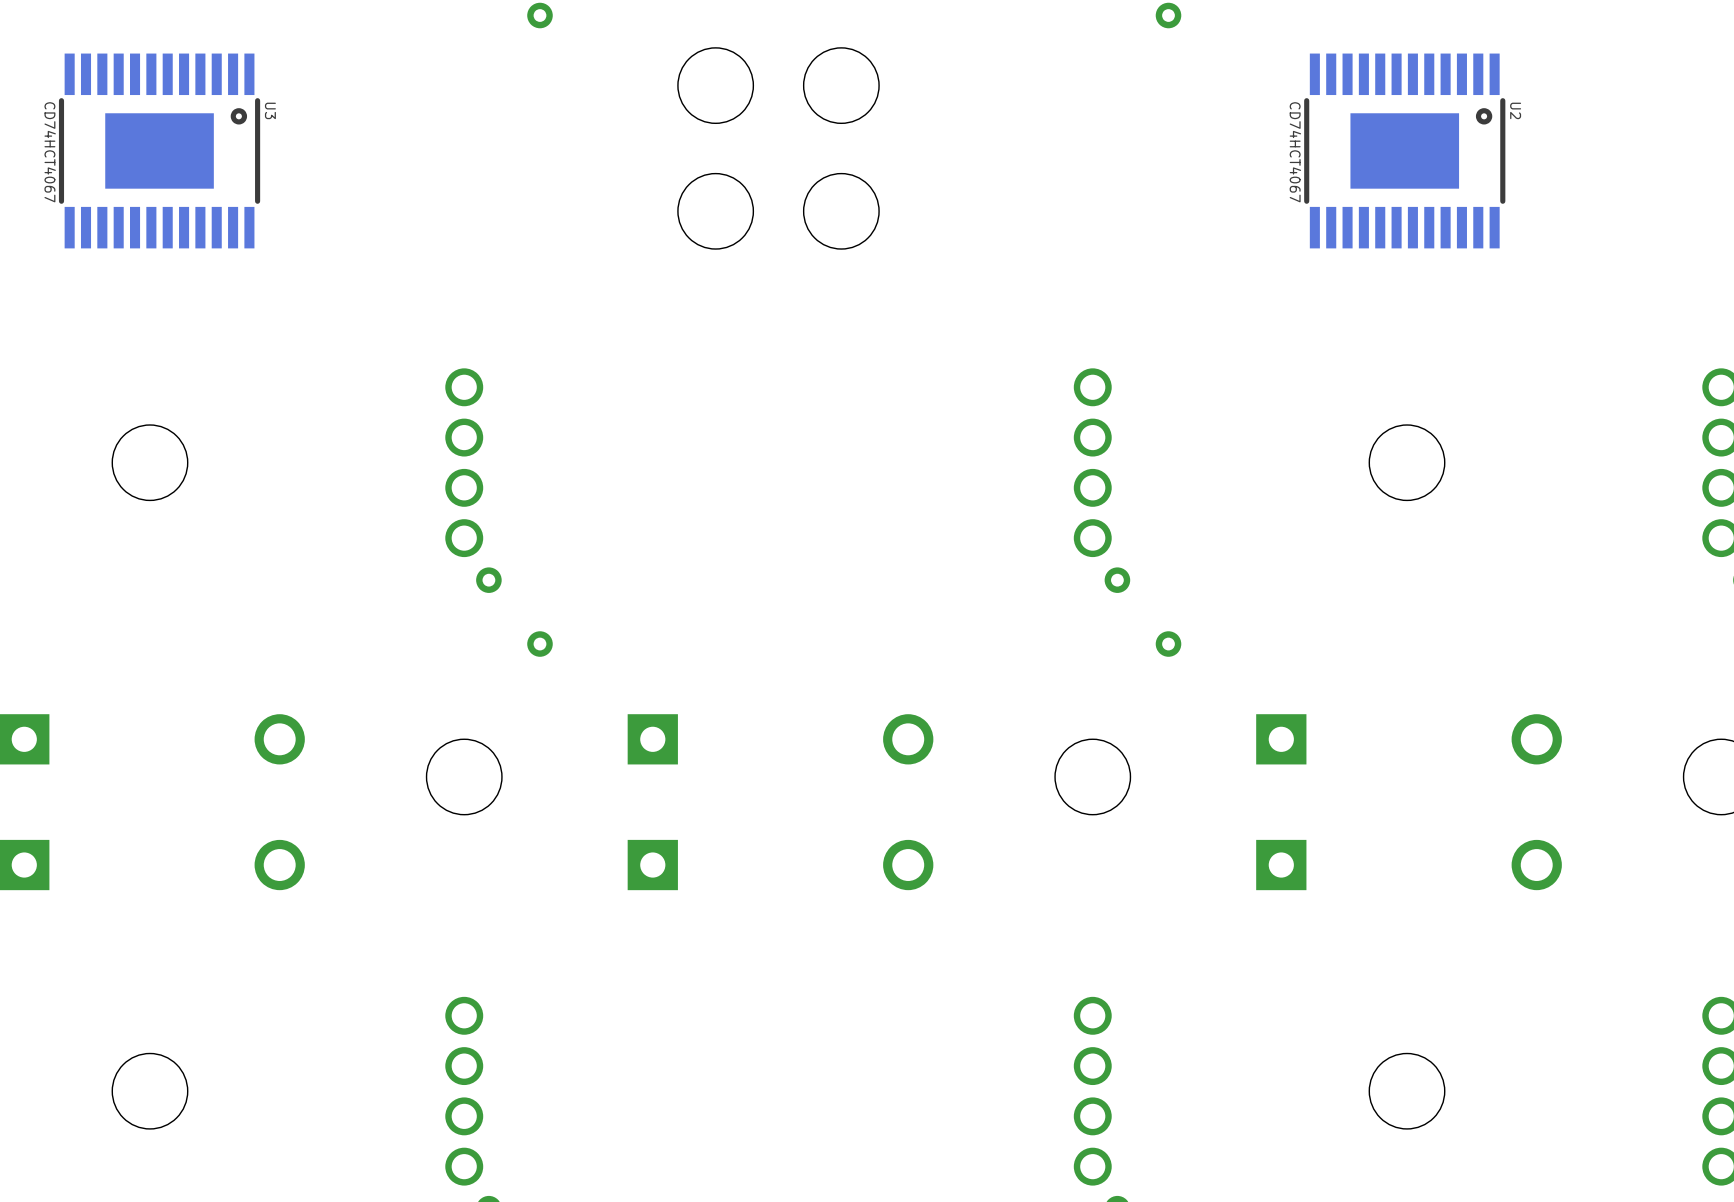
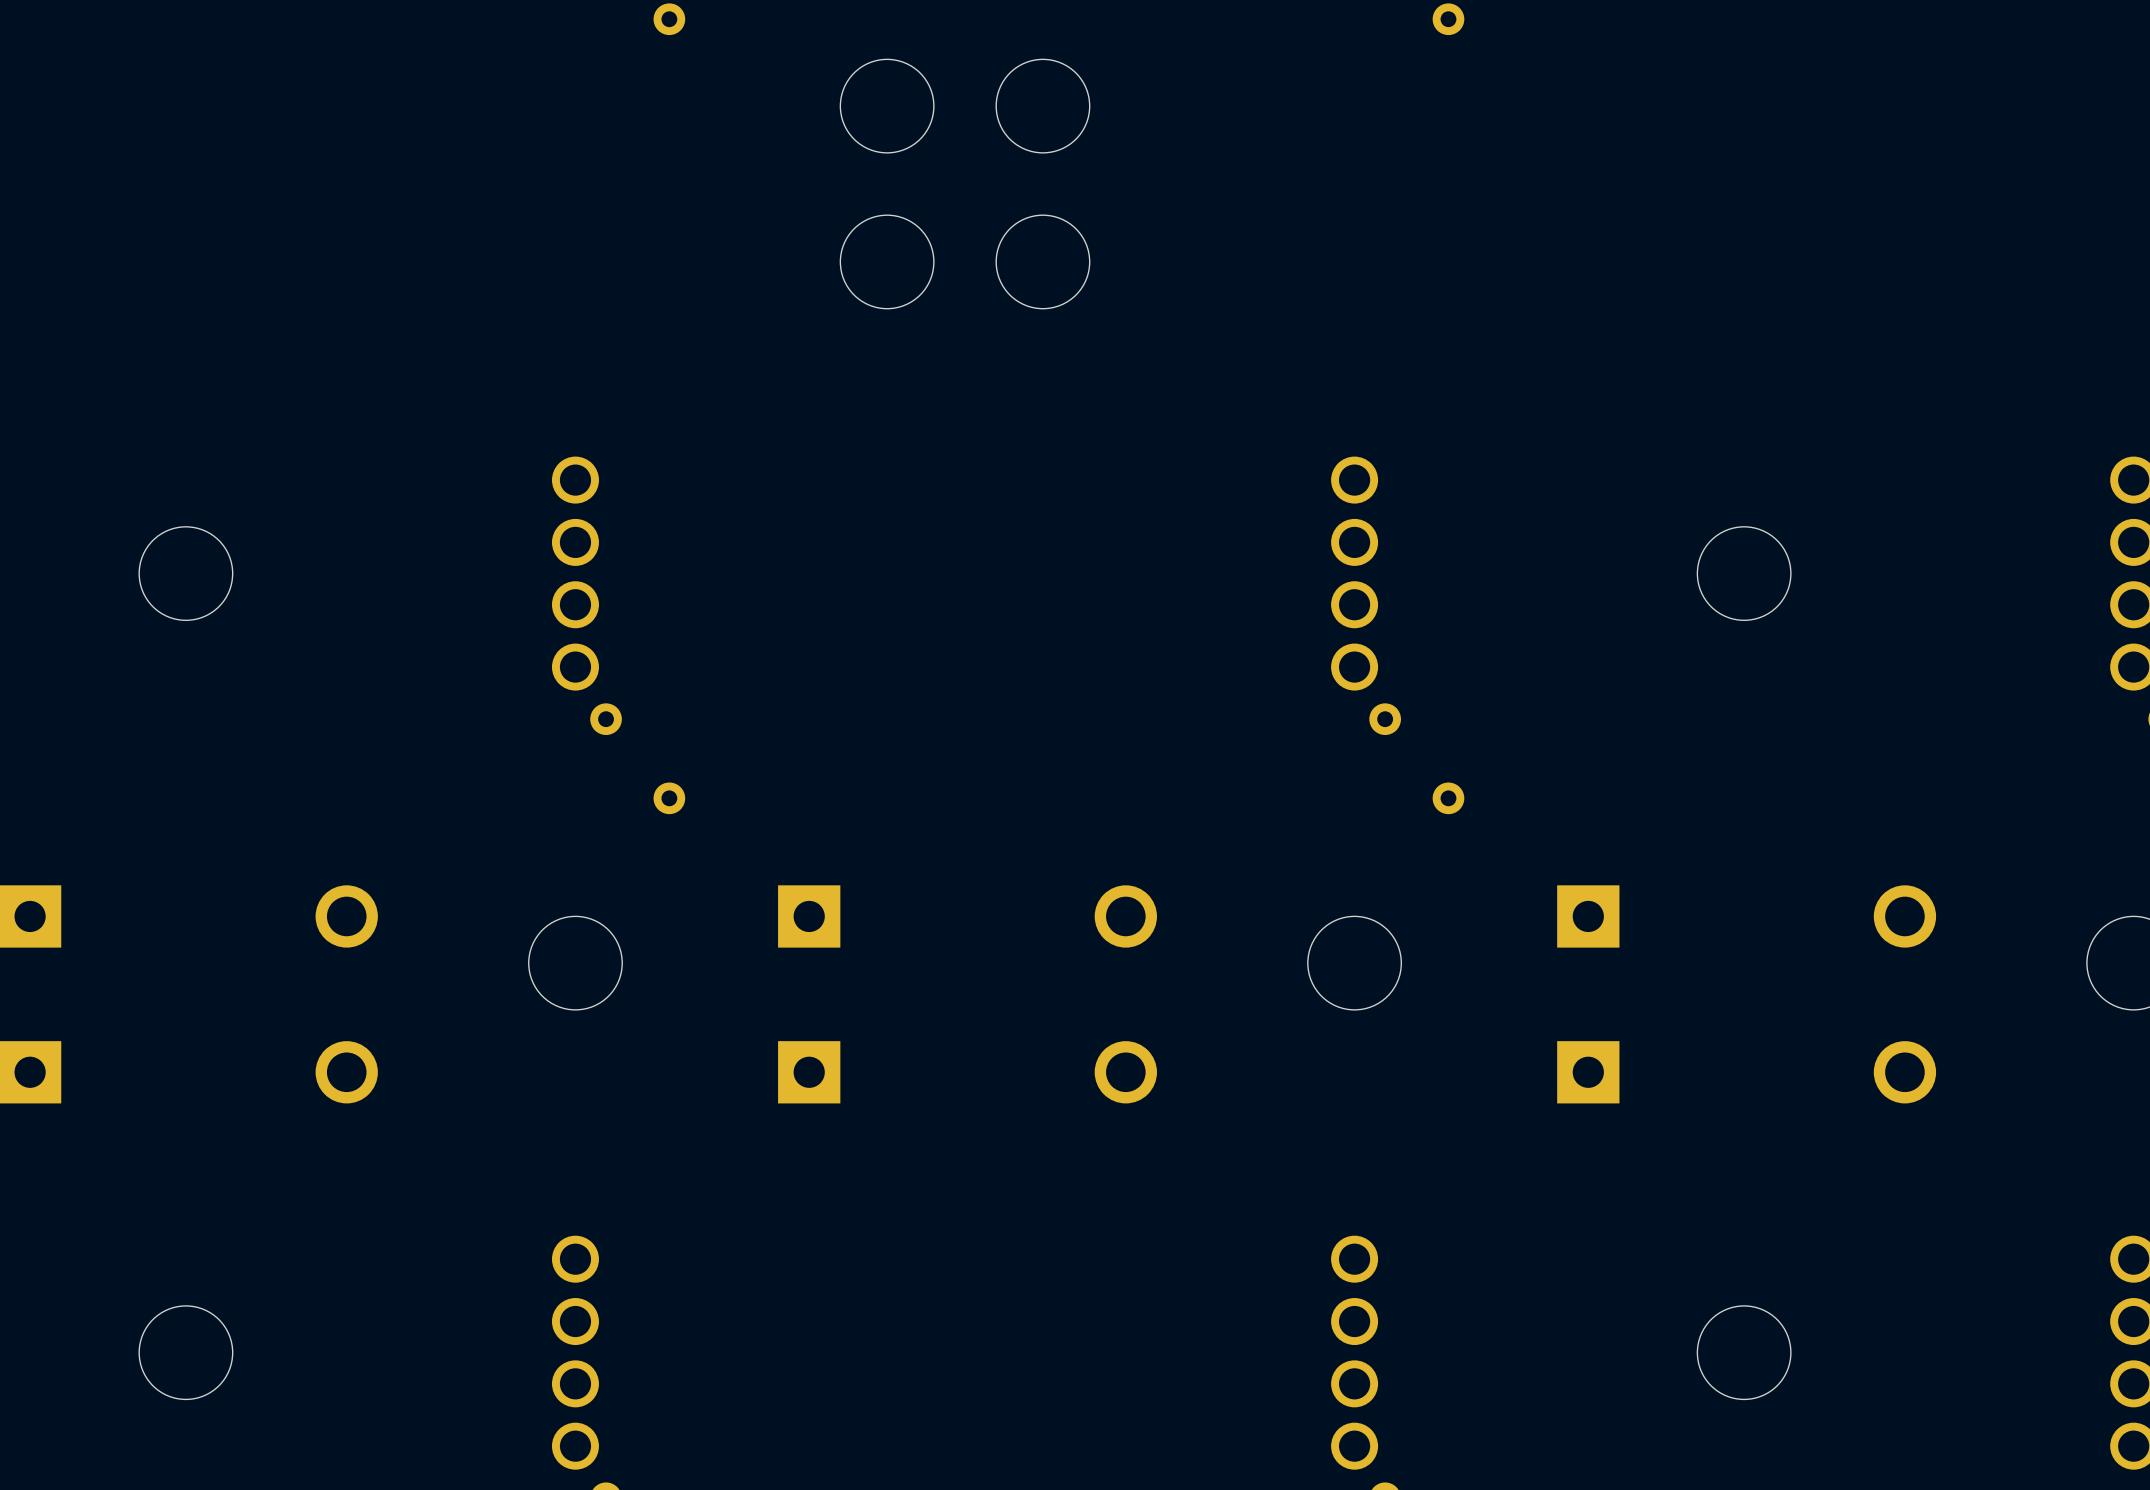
U3: CD74HCT4067 (159, 150) -> none
U2: CD74HCT4067 (1404, 150) -> none

